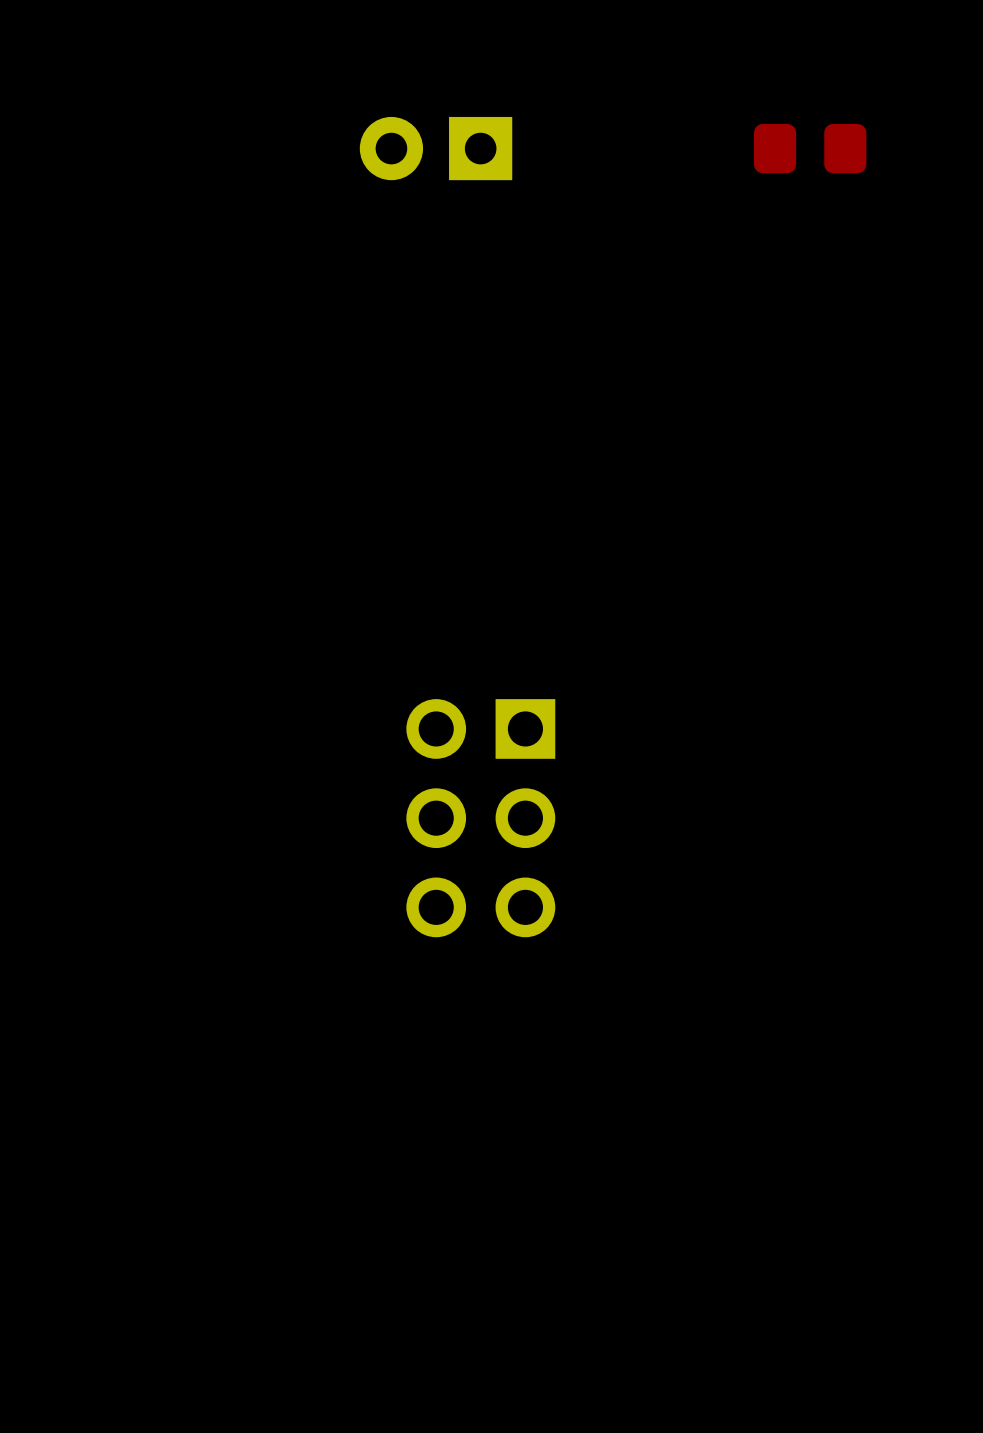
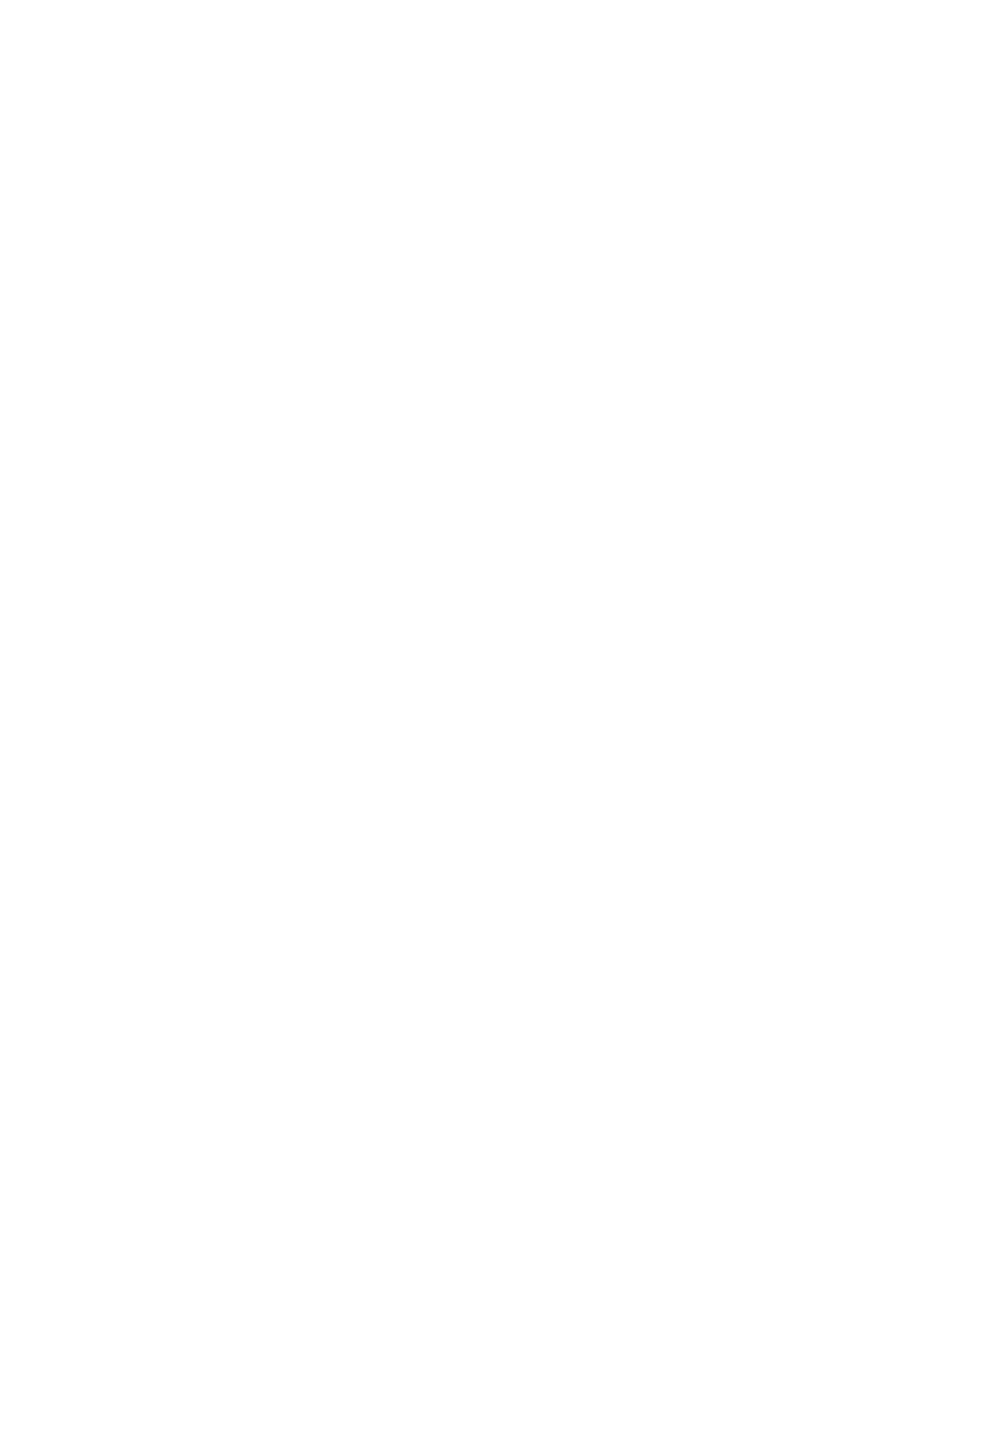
part: (436, 148) -> none
part: (810, 148) -> none
part: (480, 818) -> none

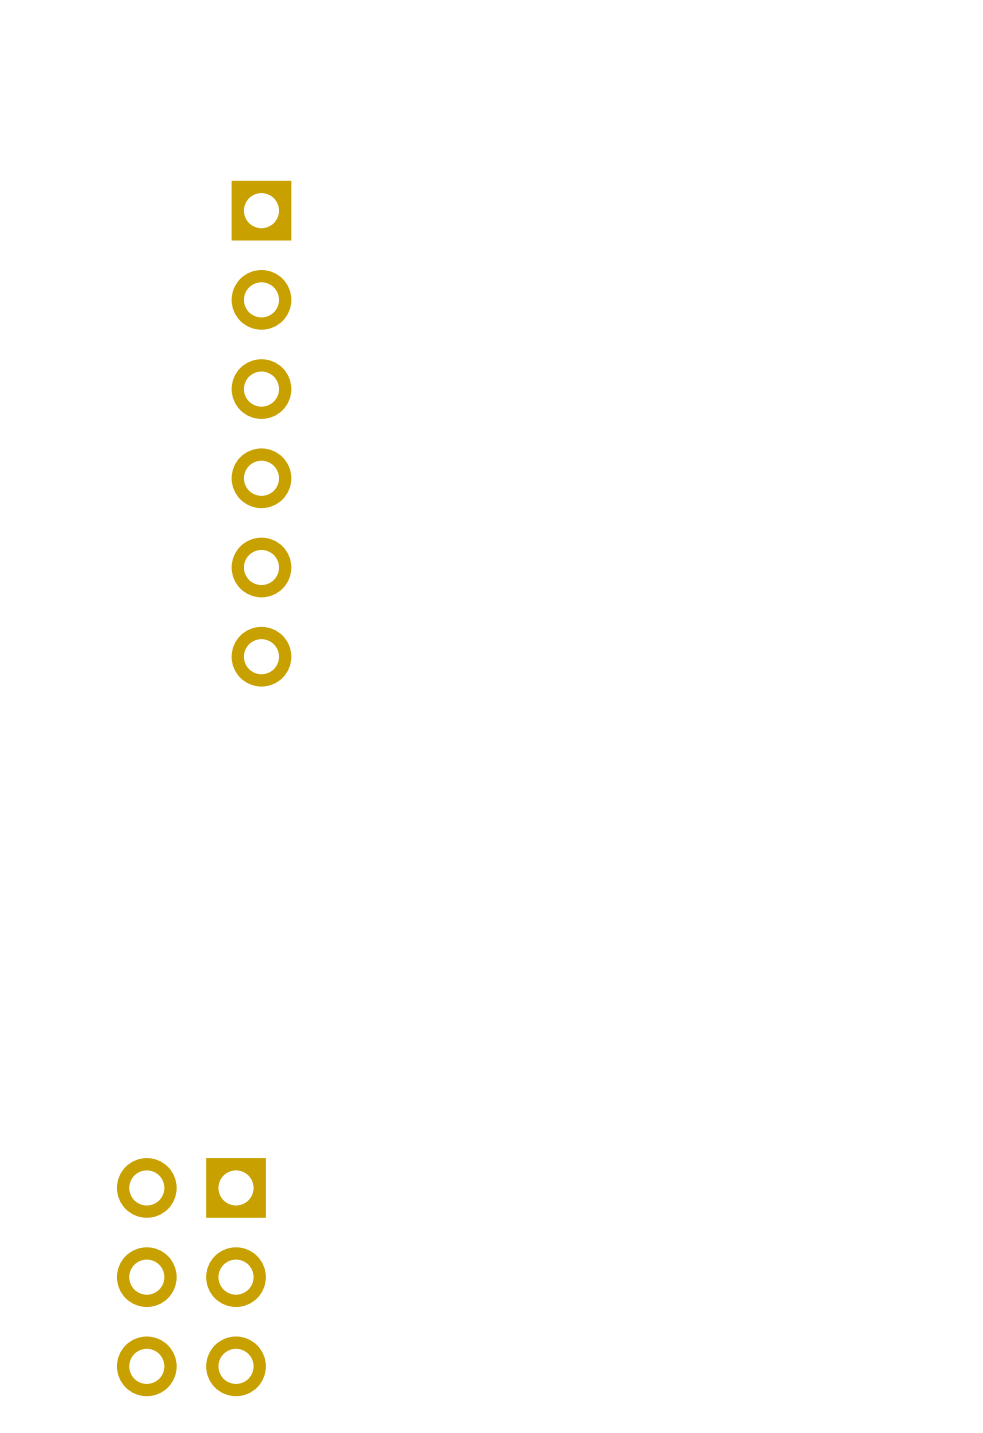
part: none -> (261, 433)
part: none -> (191, 1277)

